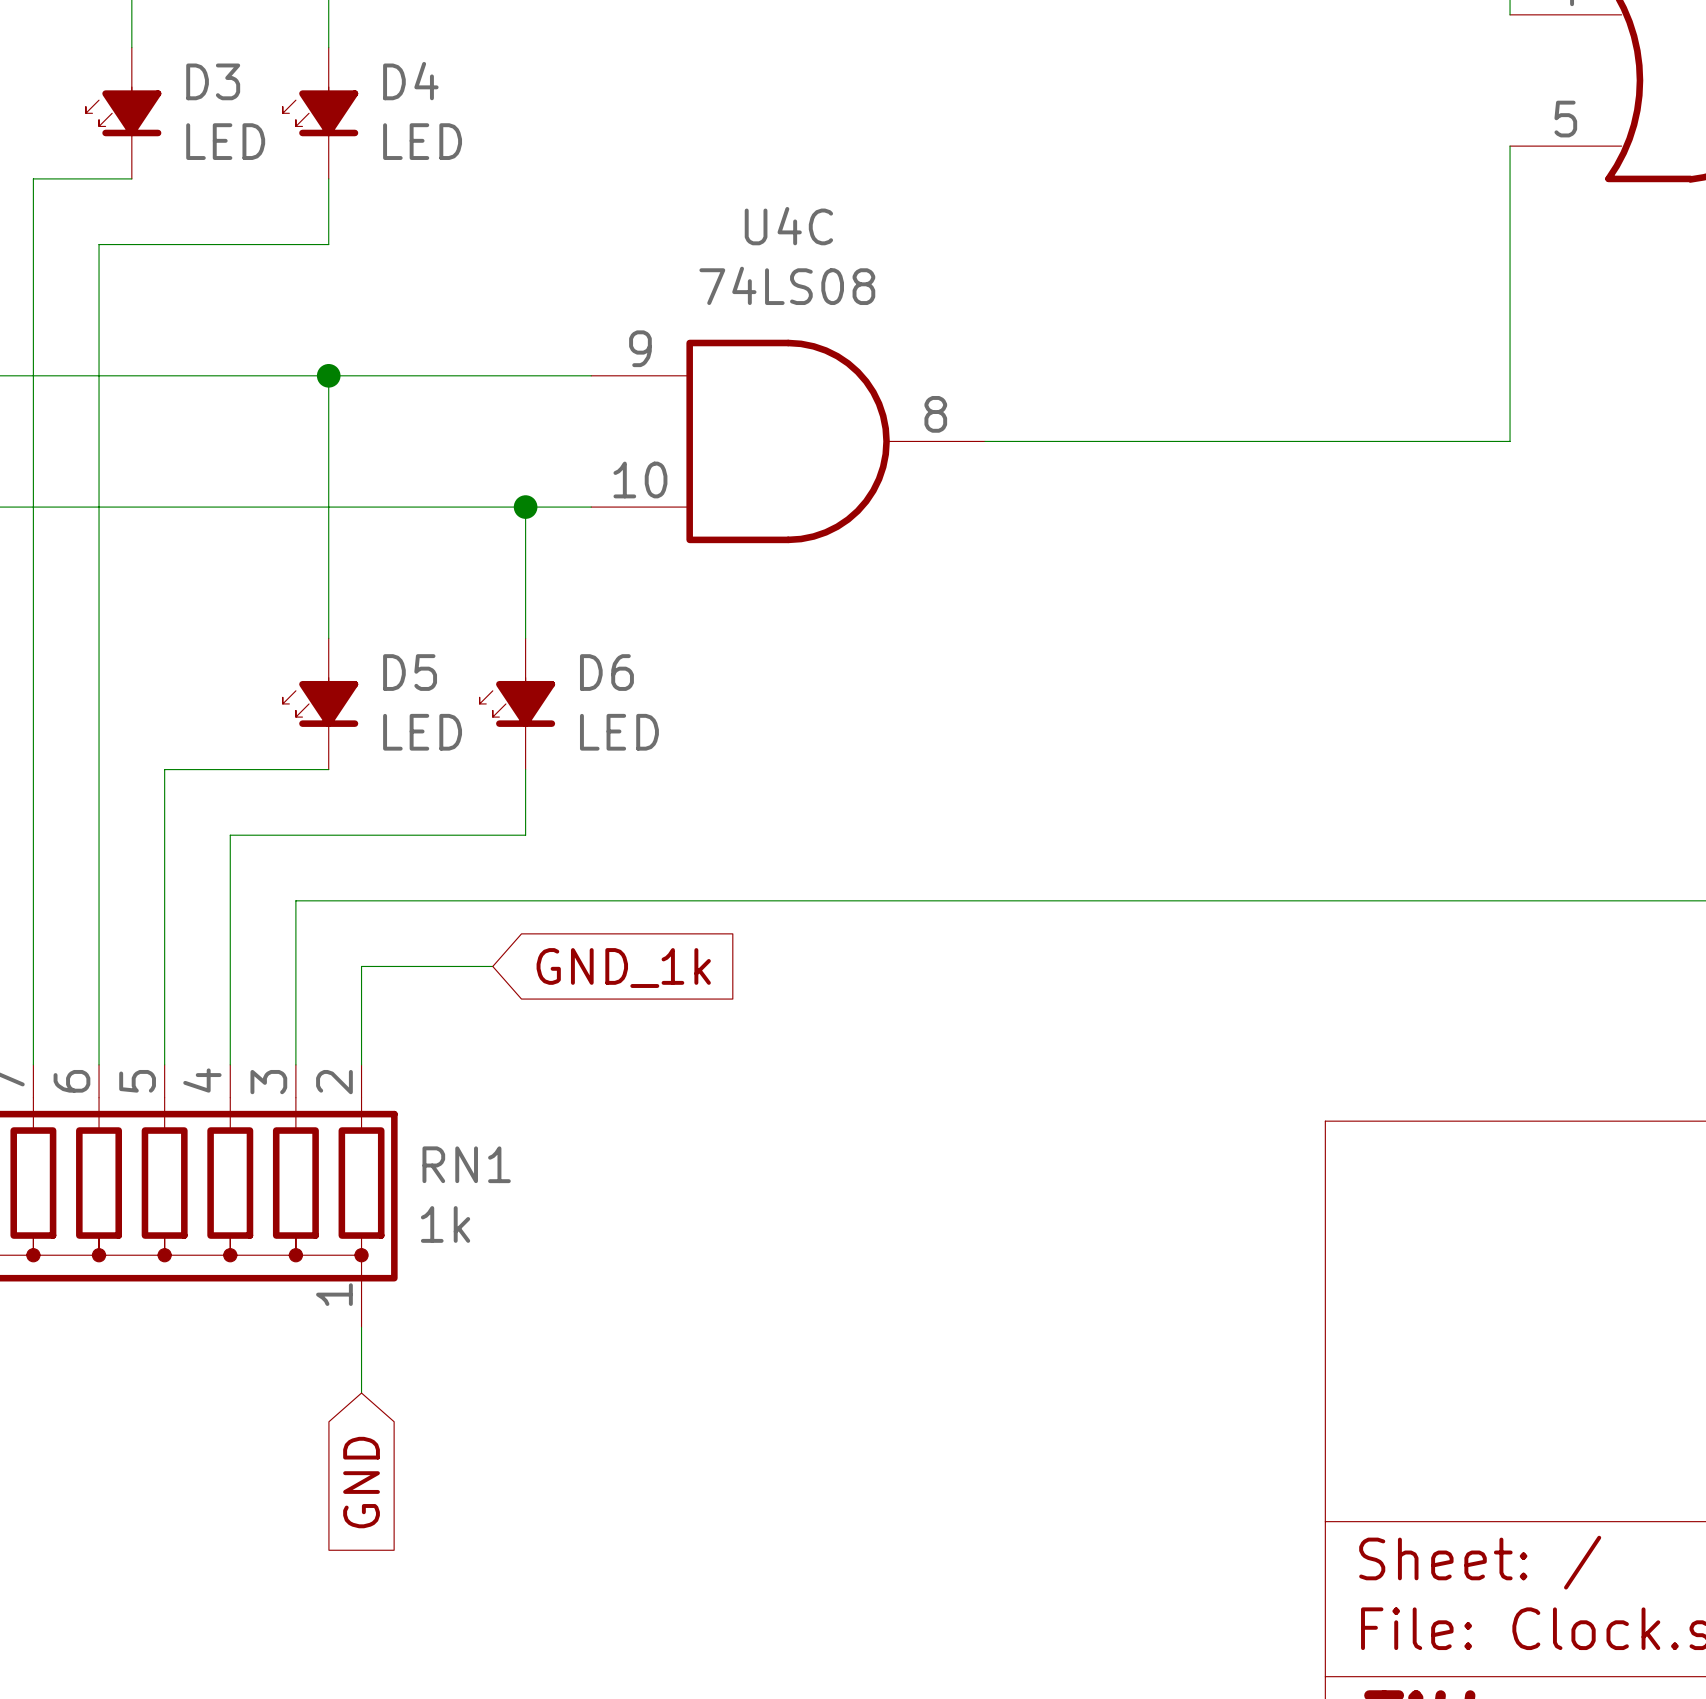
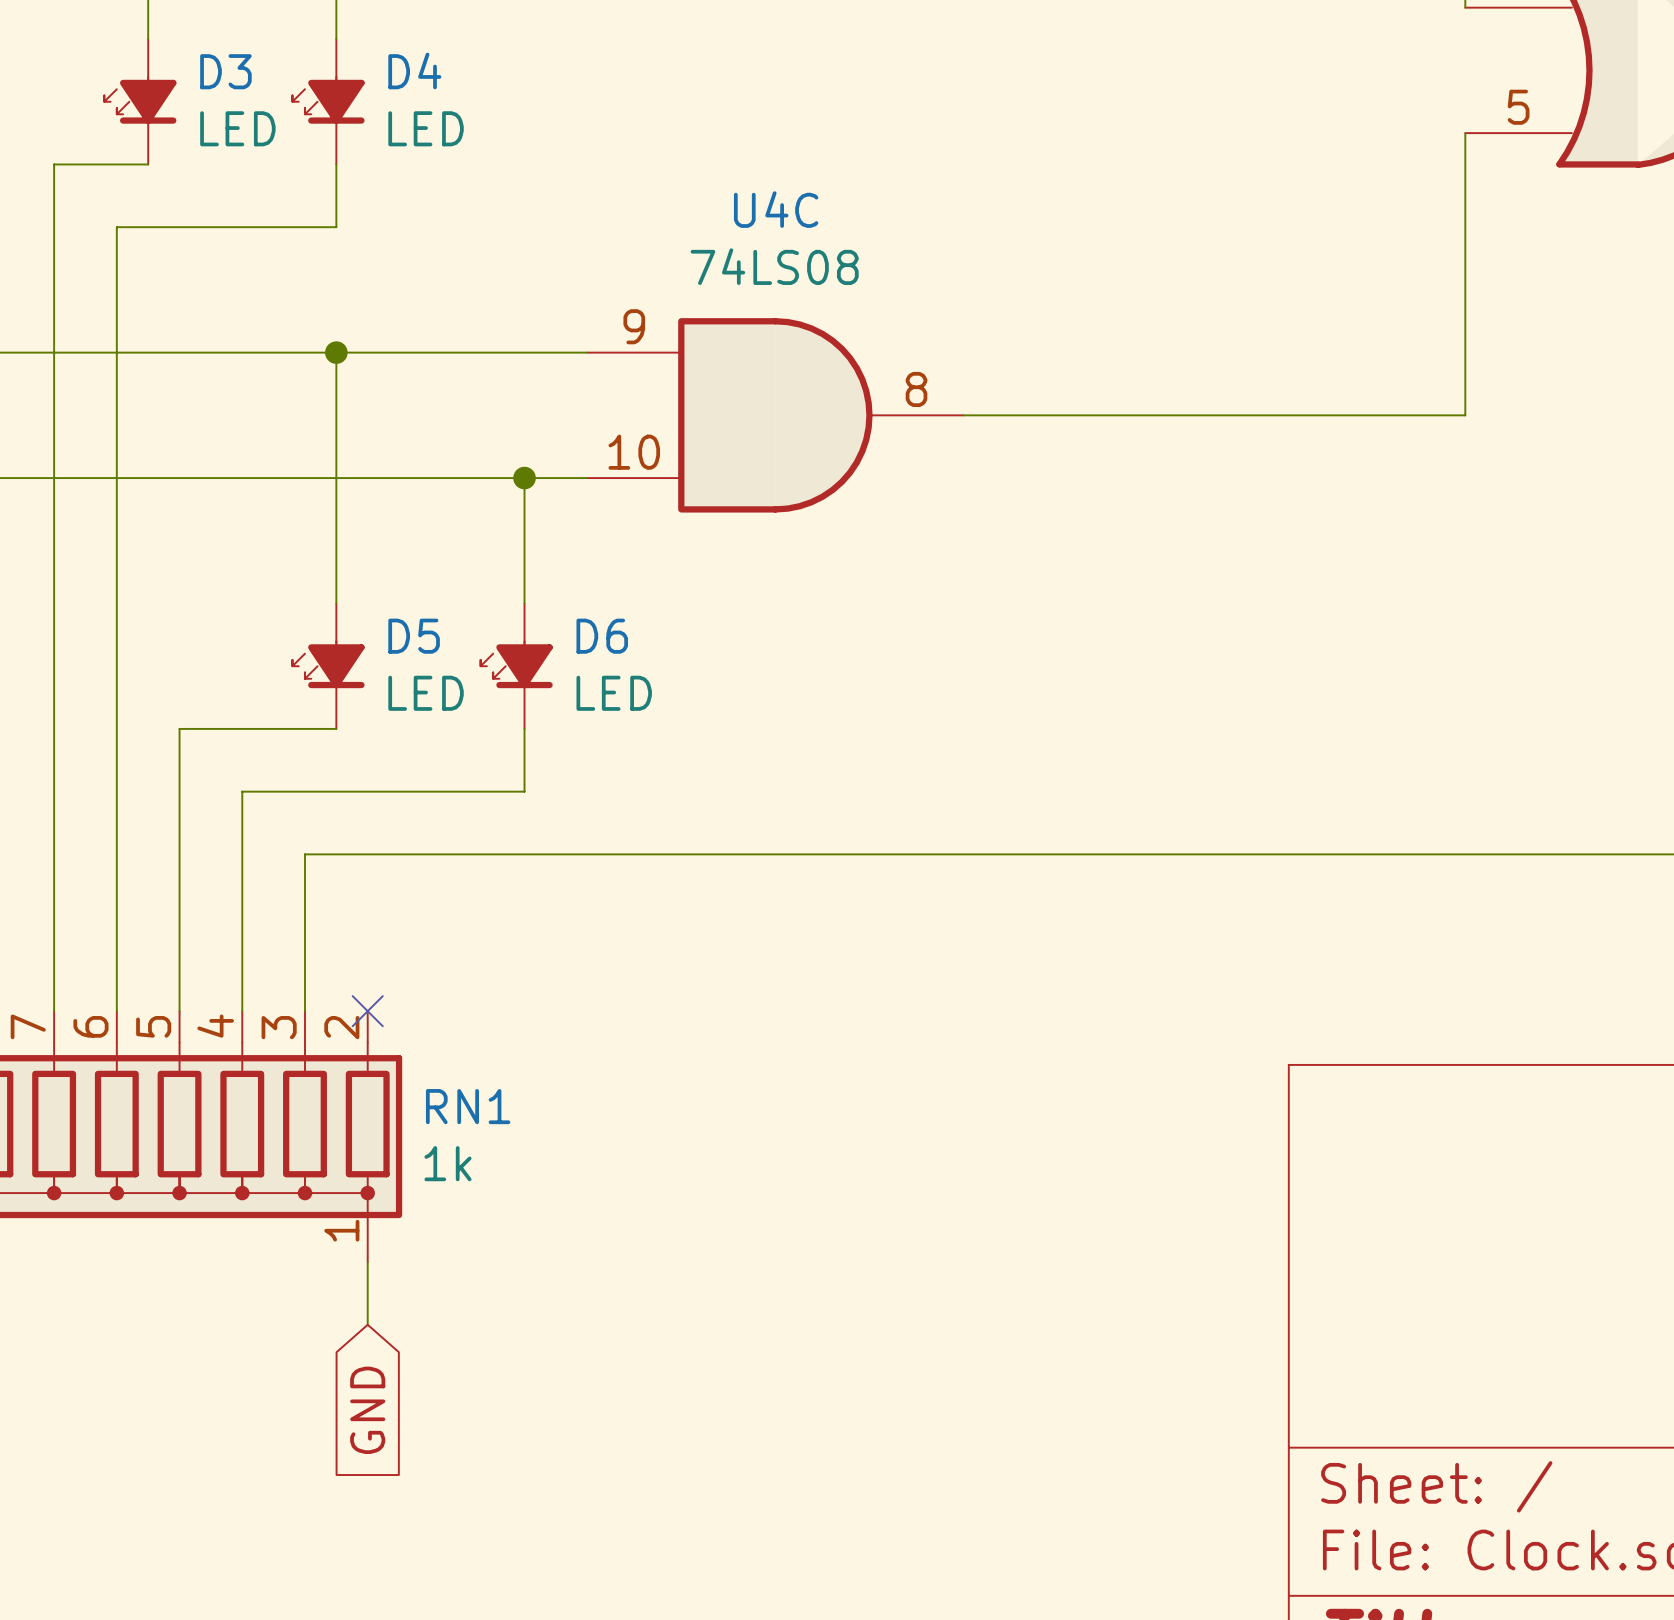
wire: (492, 966) (361, 966) (361, 1064) -> none
global label: GND_1k (623, 968) -> none
no-connect mark: none -> (367, 1011)

